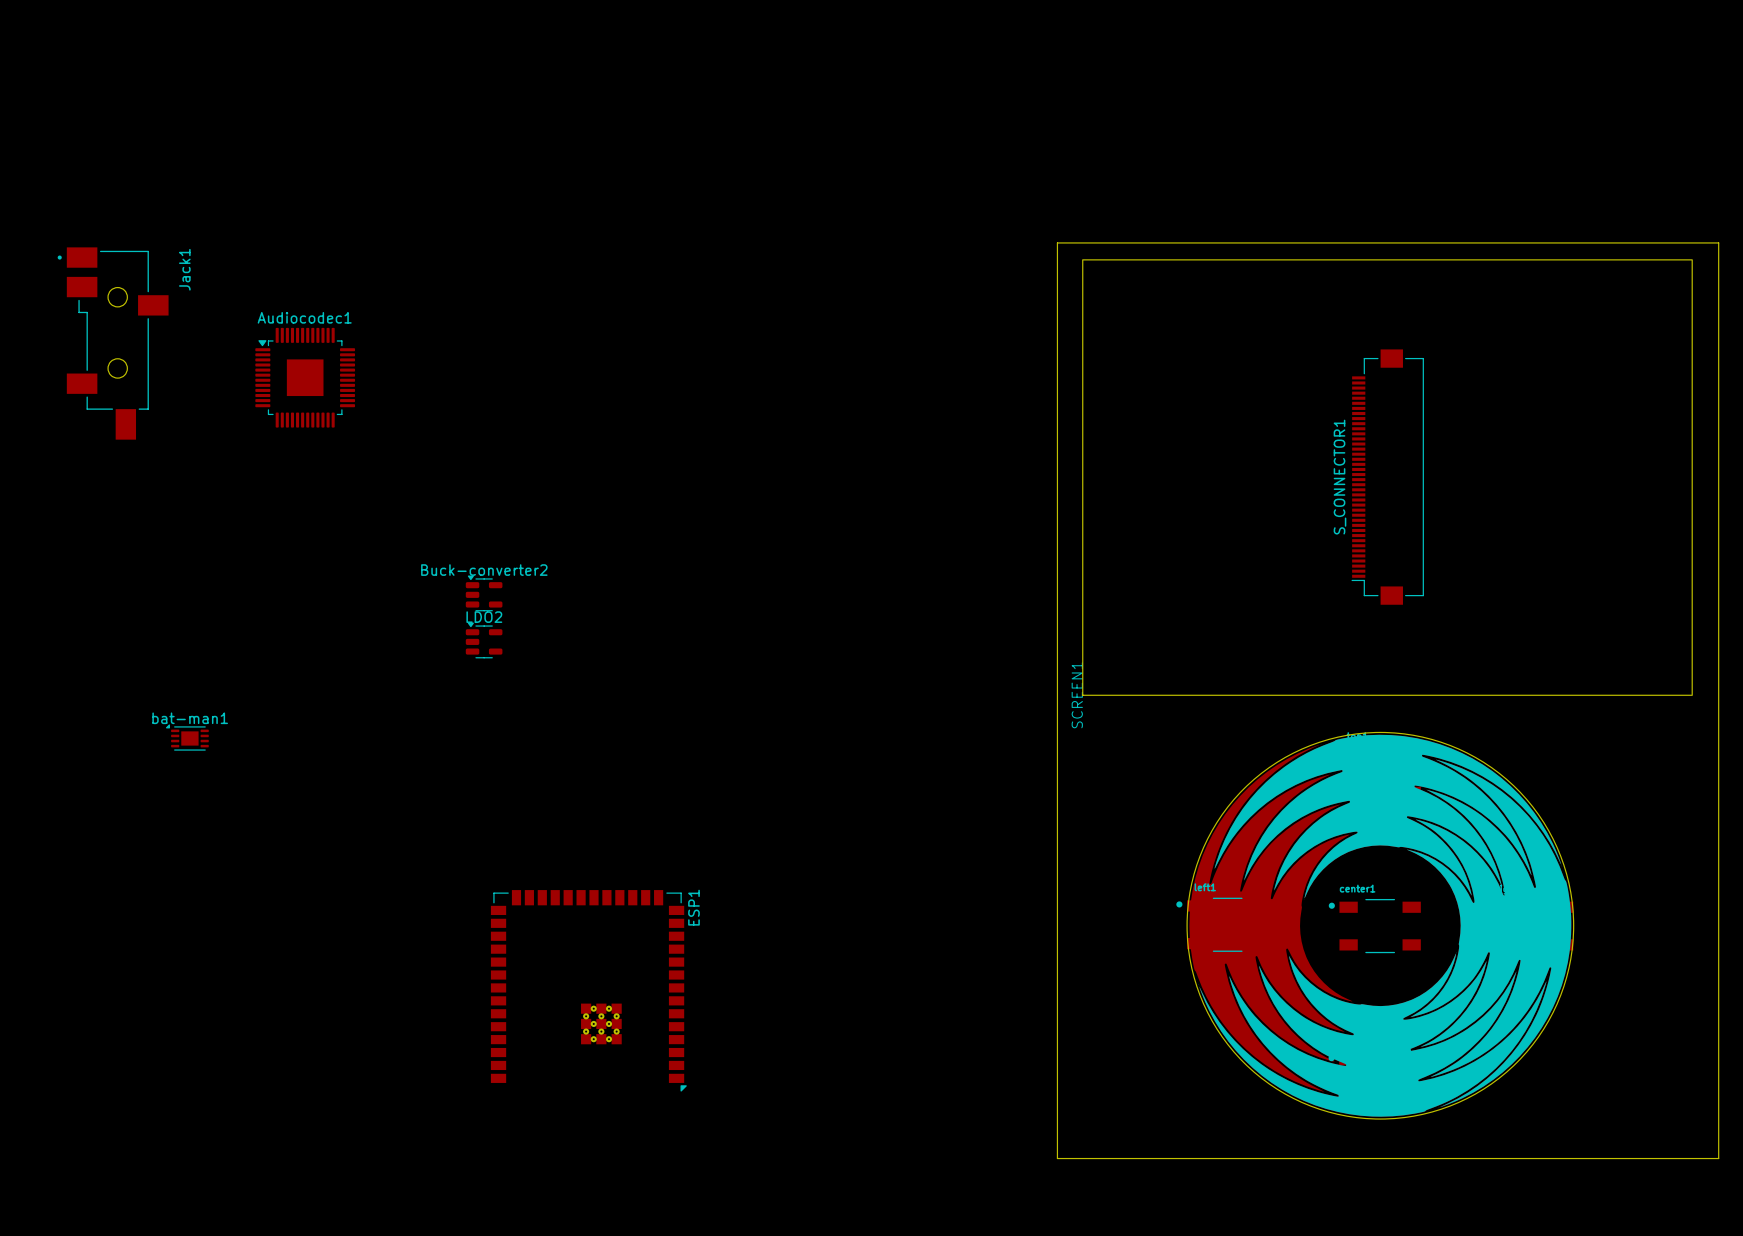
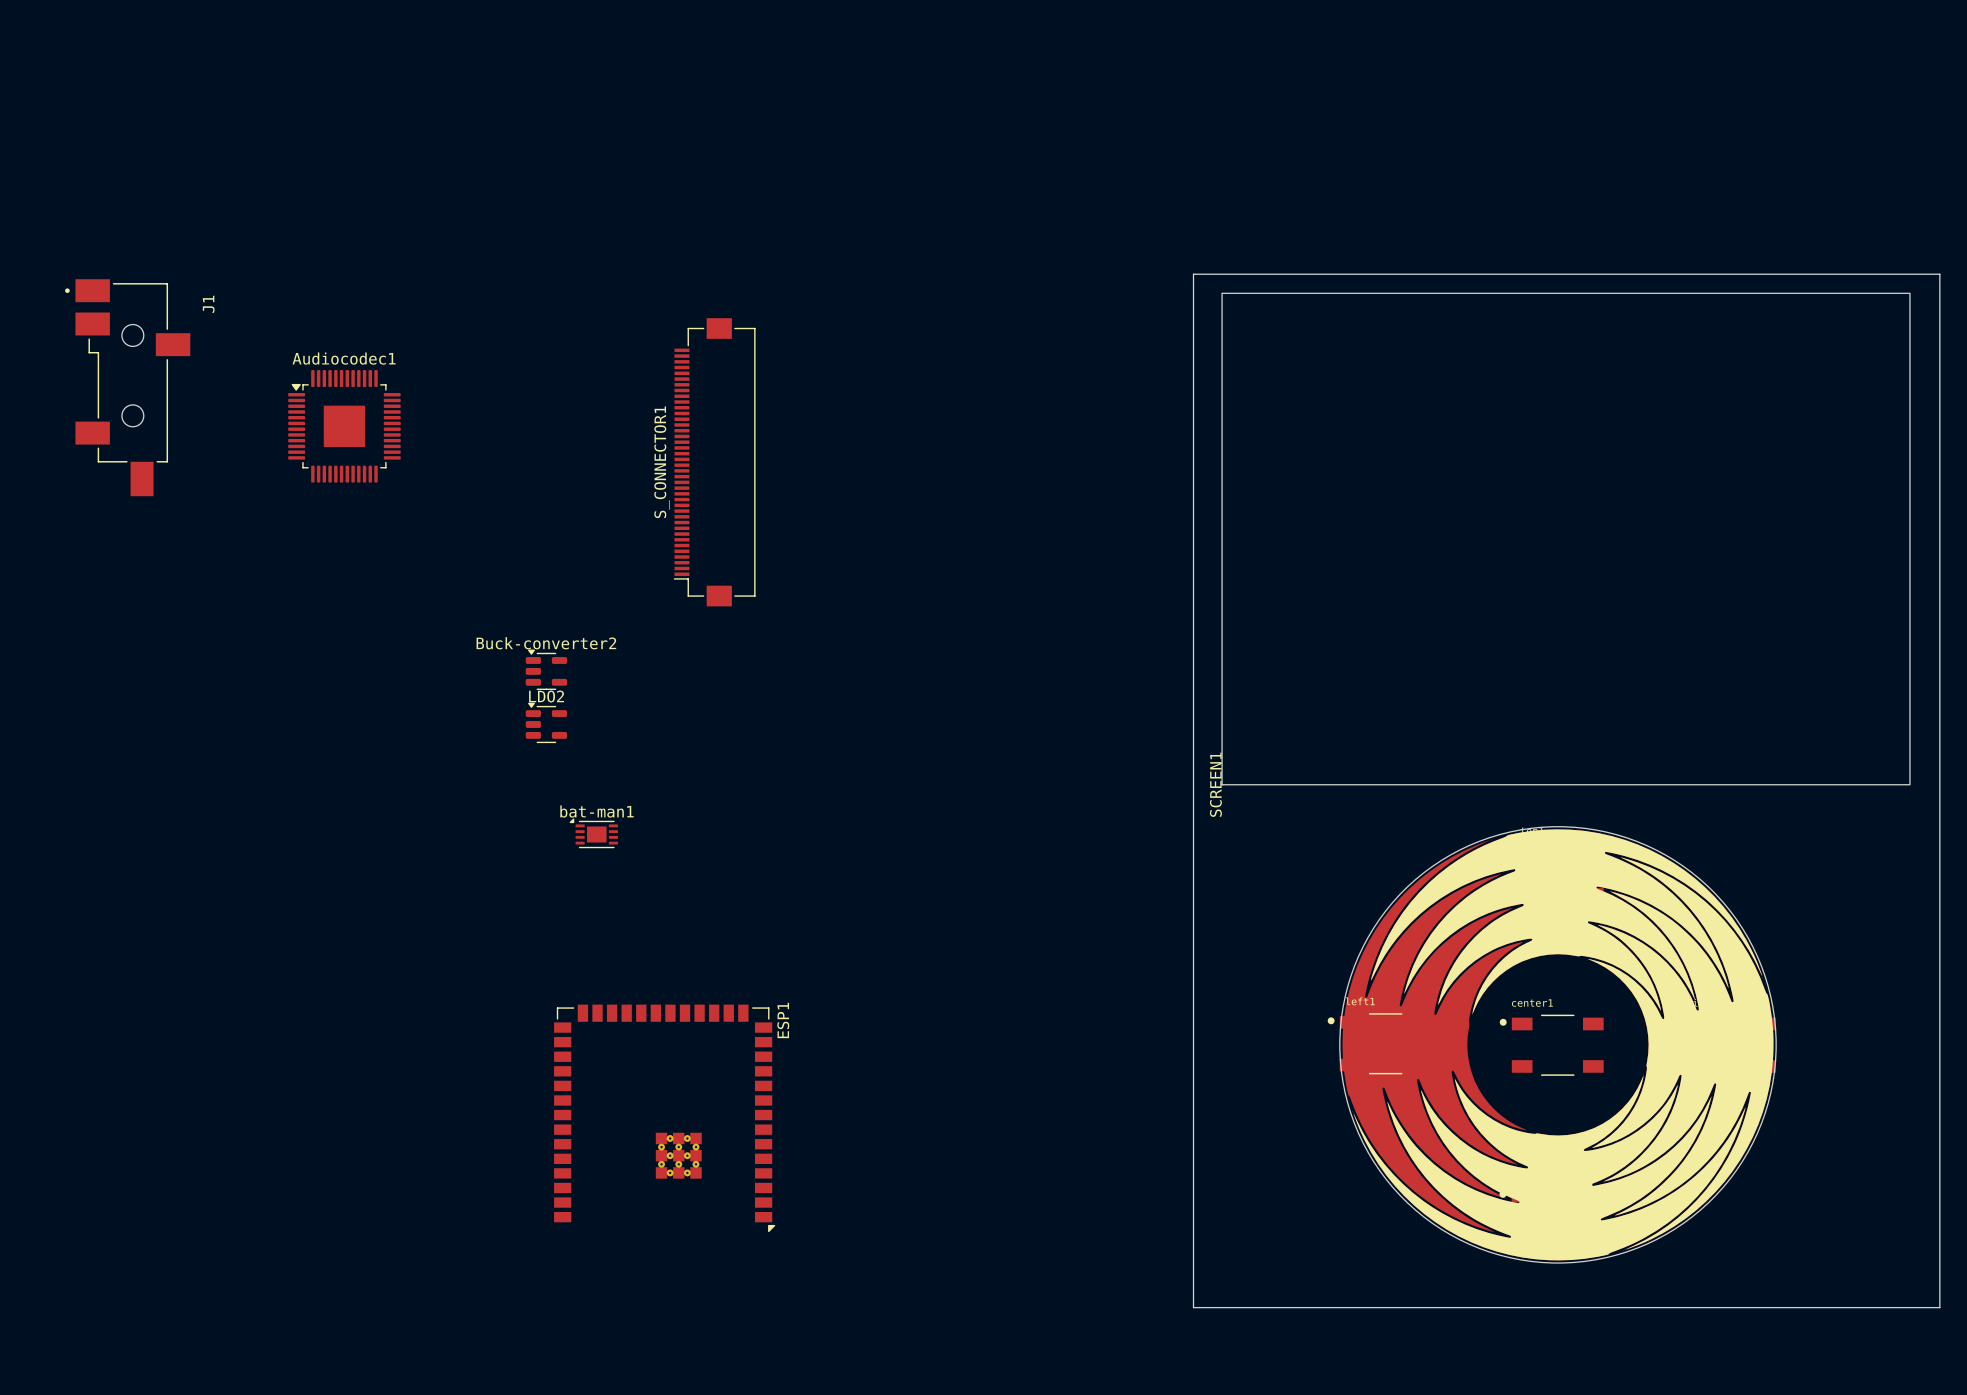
Jack1 name: Jack1 (184, 269) -> J1 (208, 304)
S_CONNECTOR1 position: (1387, 477) -> (714, 462)
bat-man1 position: (187, 737) -> (593, 833)

